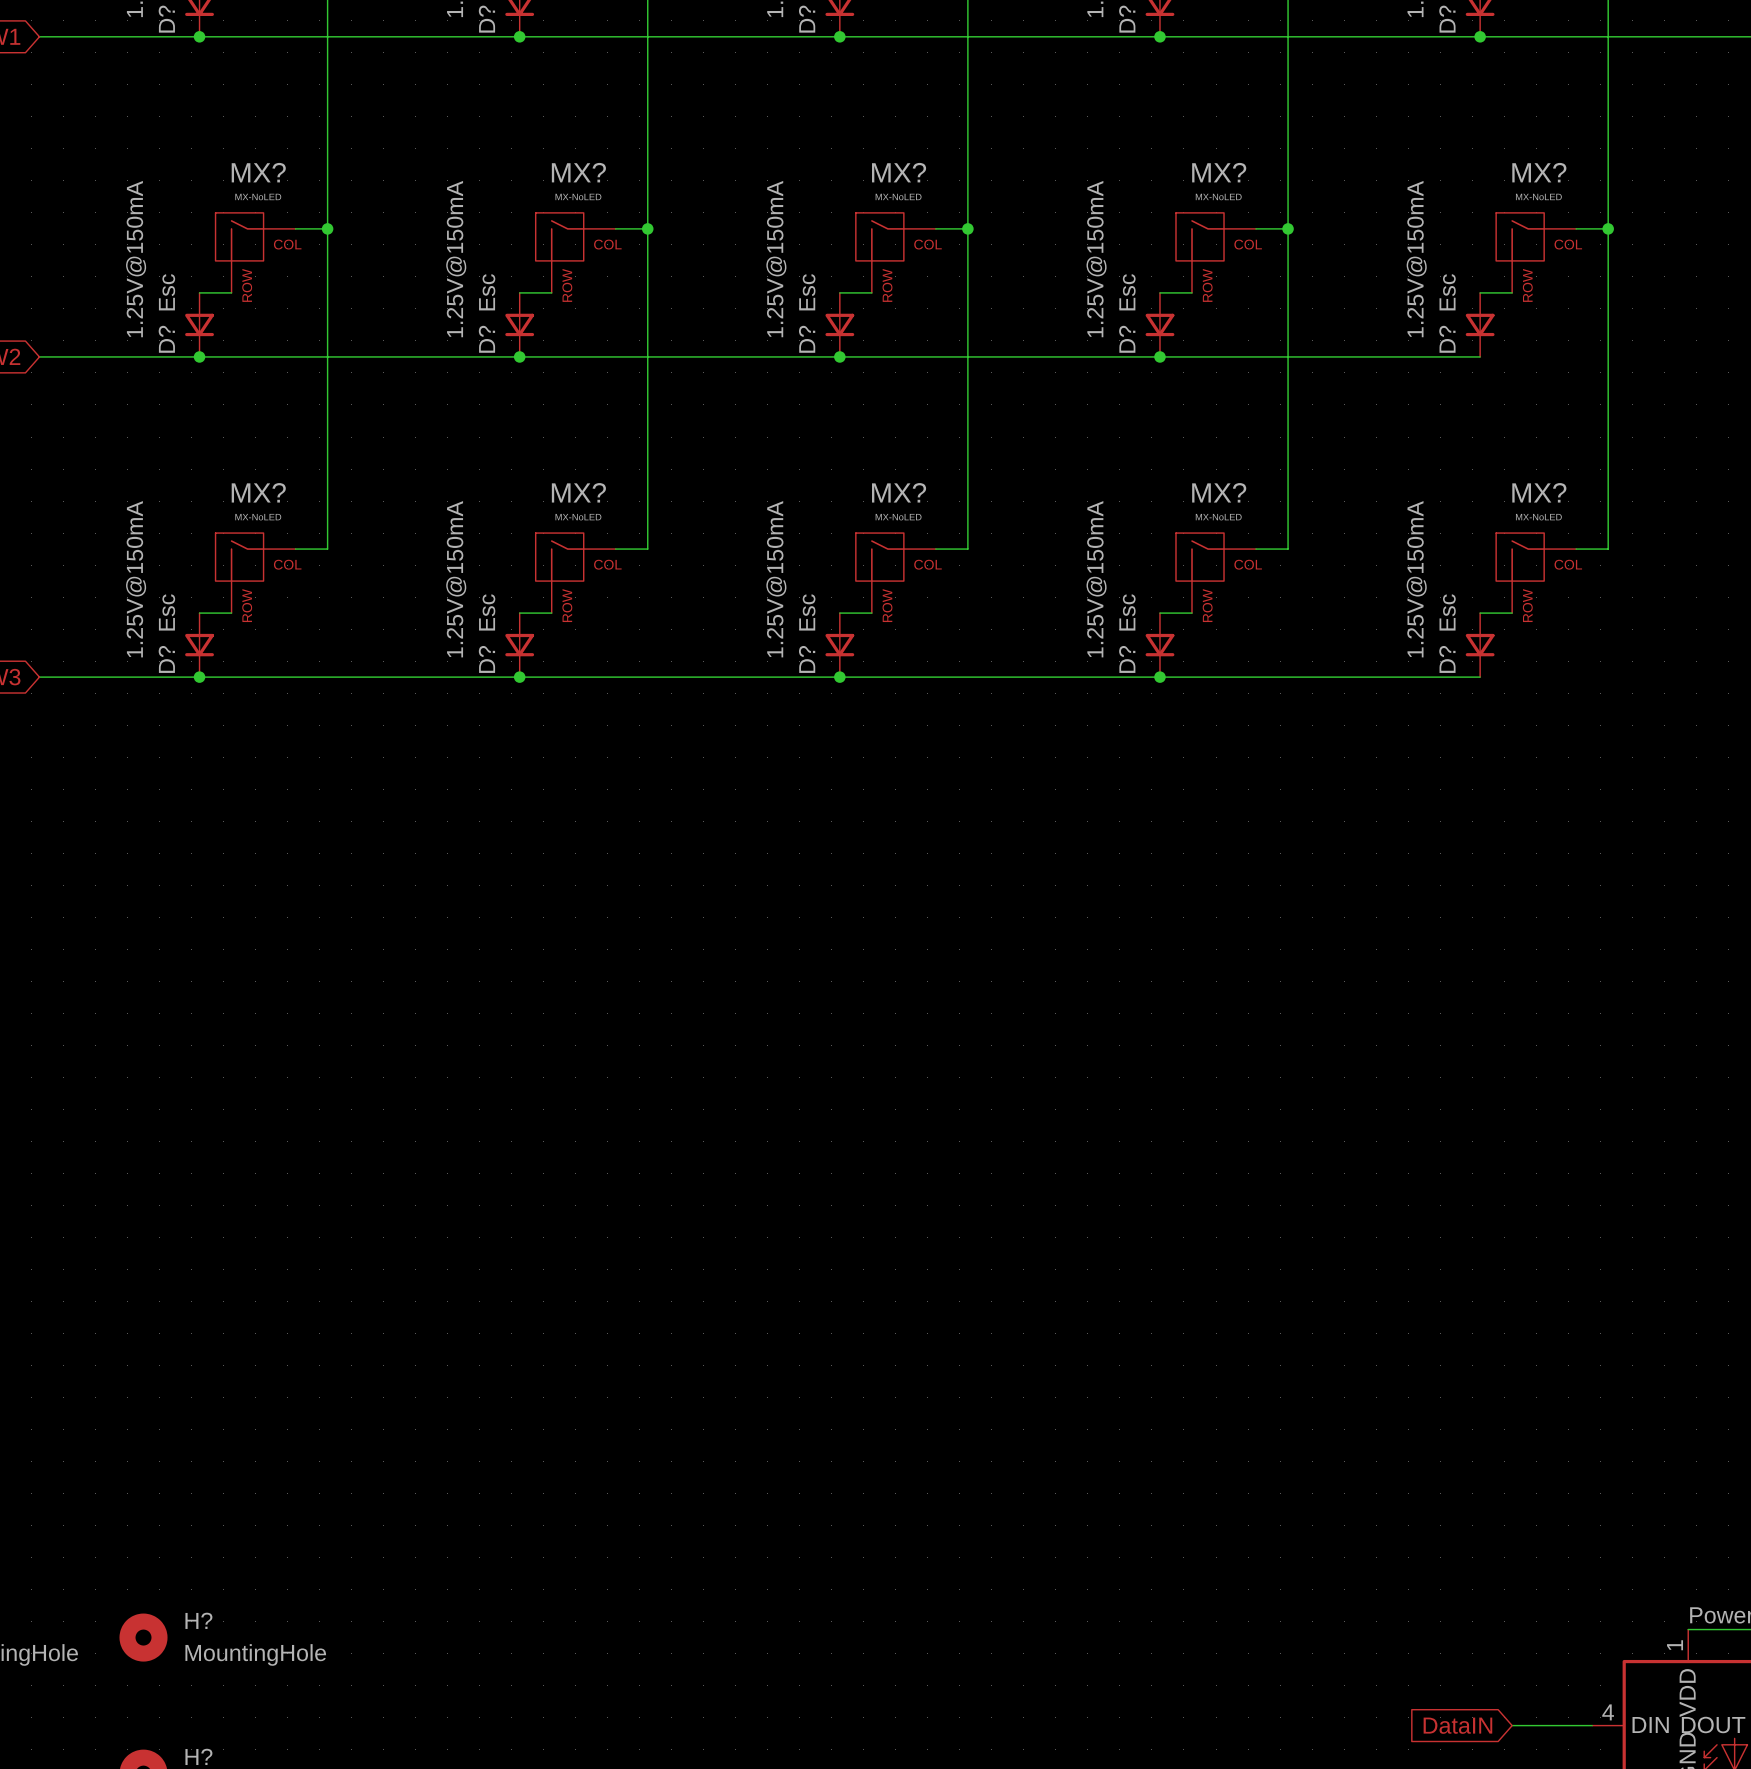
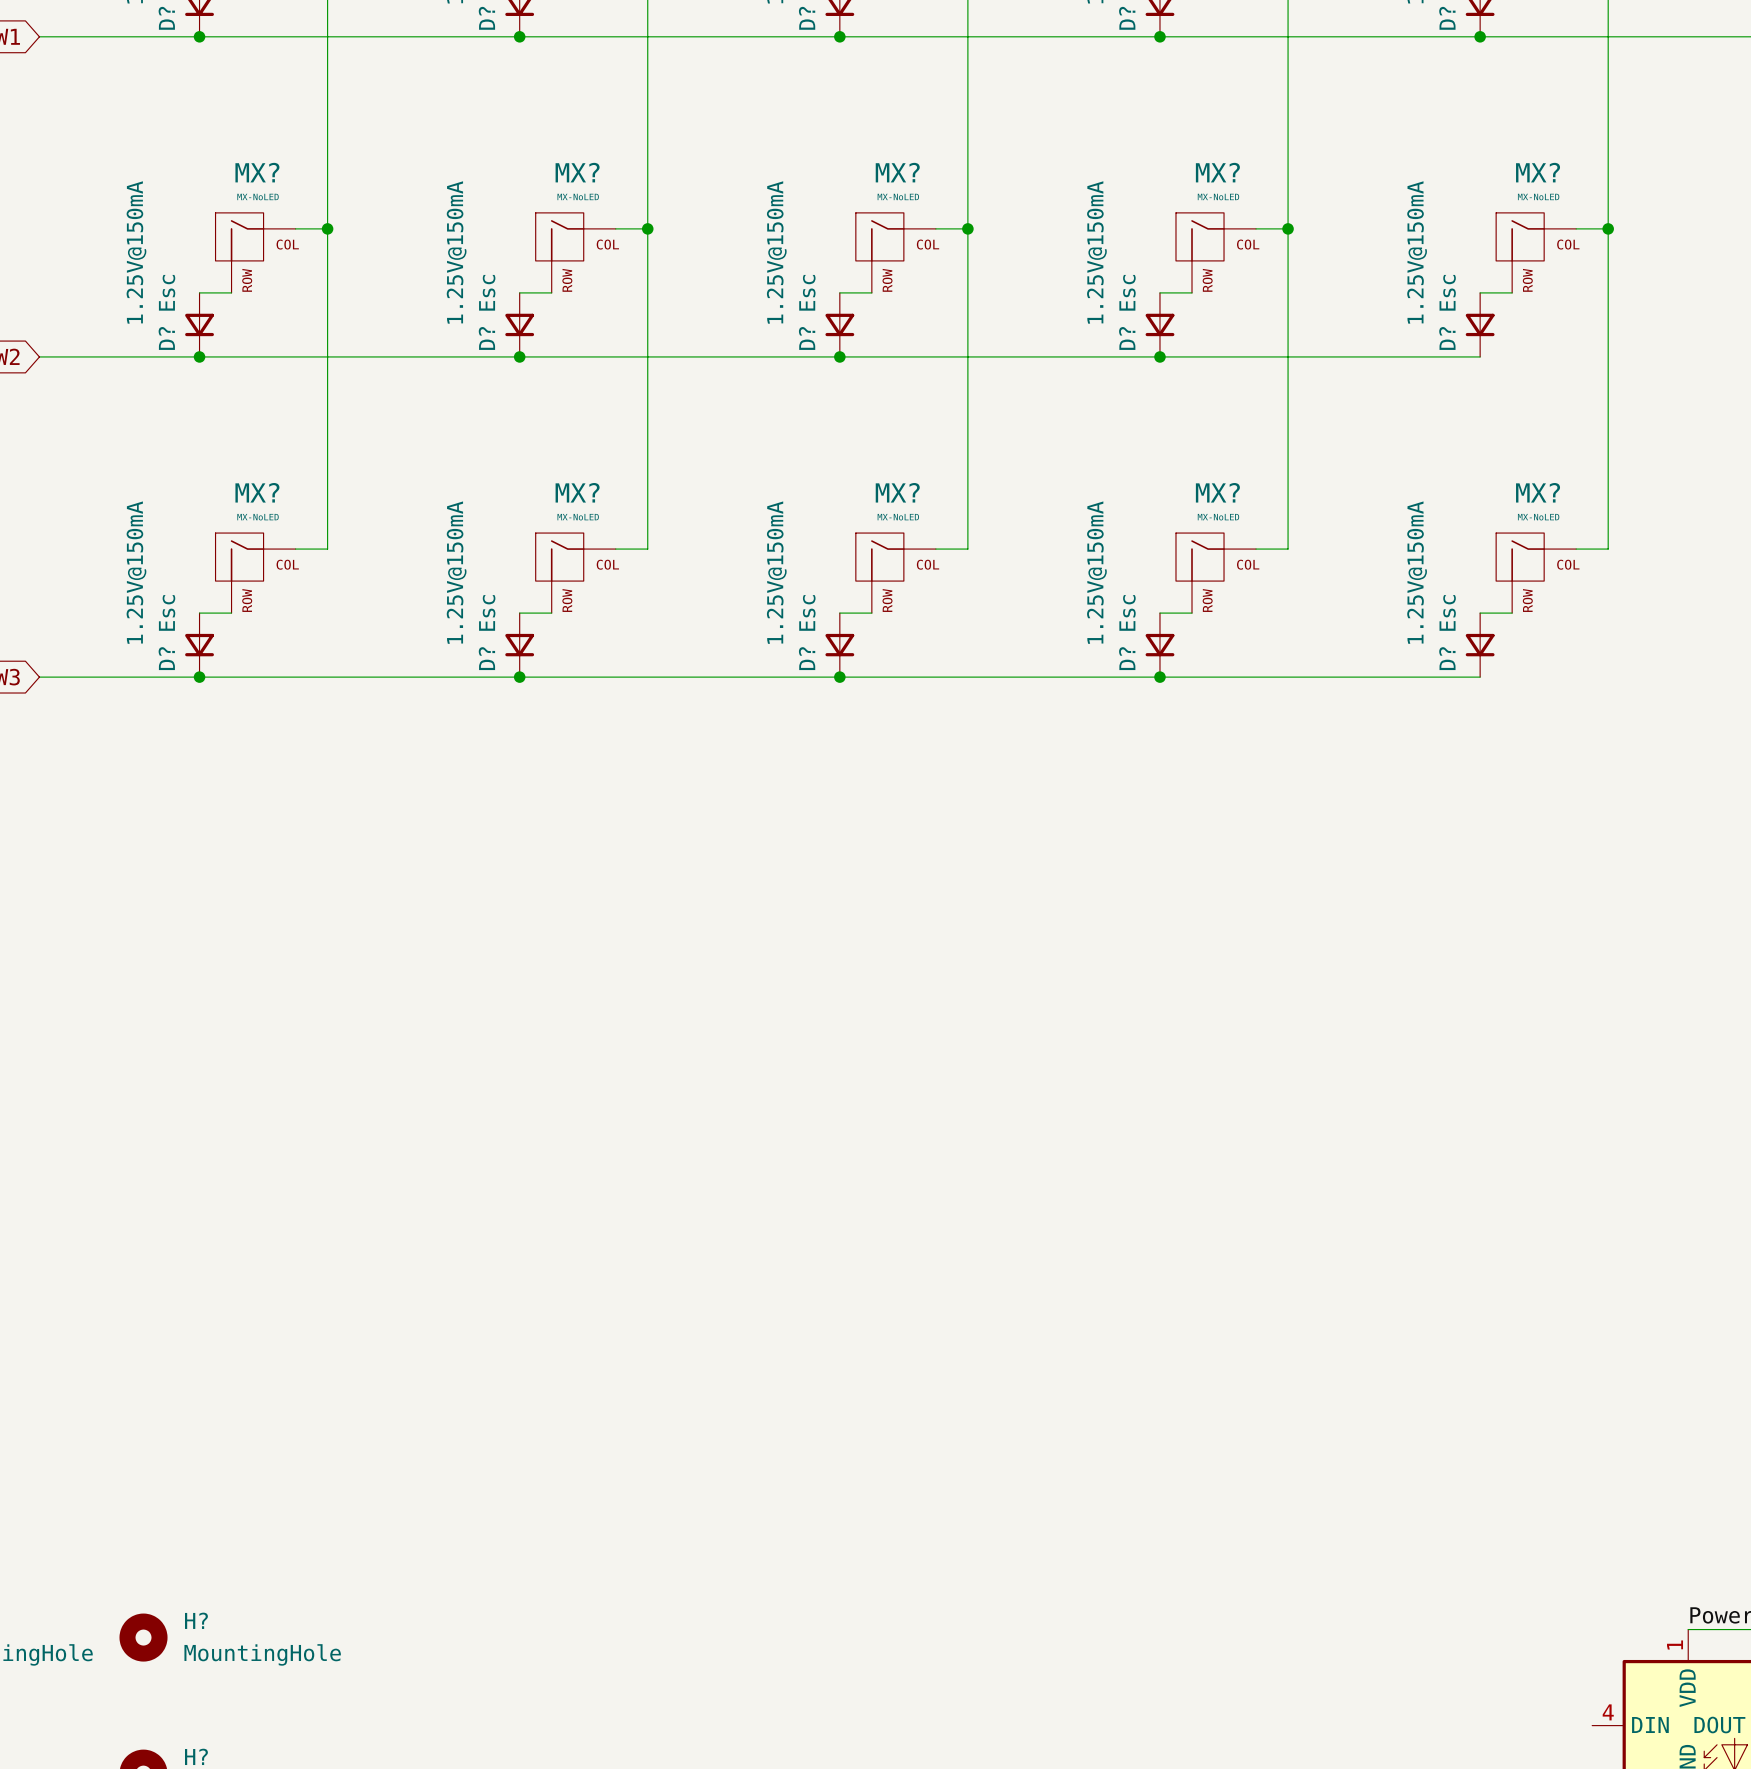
global label: DataIN (1457, 1725) -> none
wire: (1512, 1725) (1592, 1725) -> none

